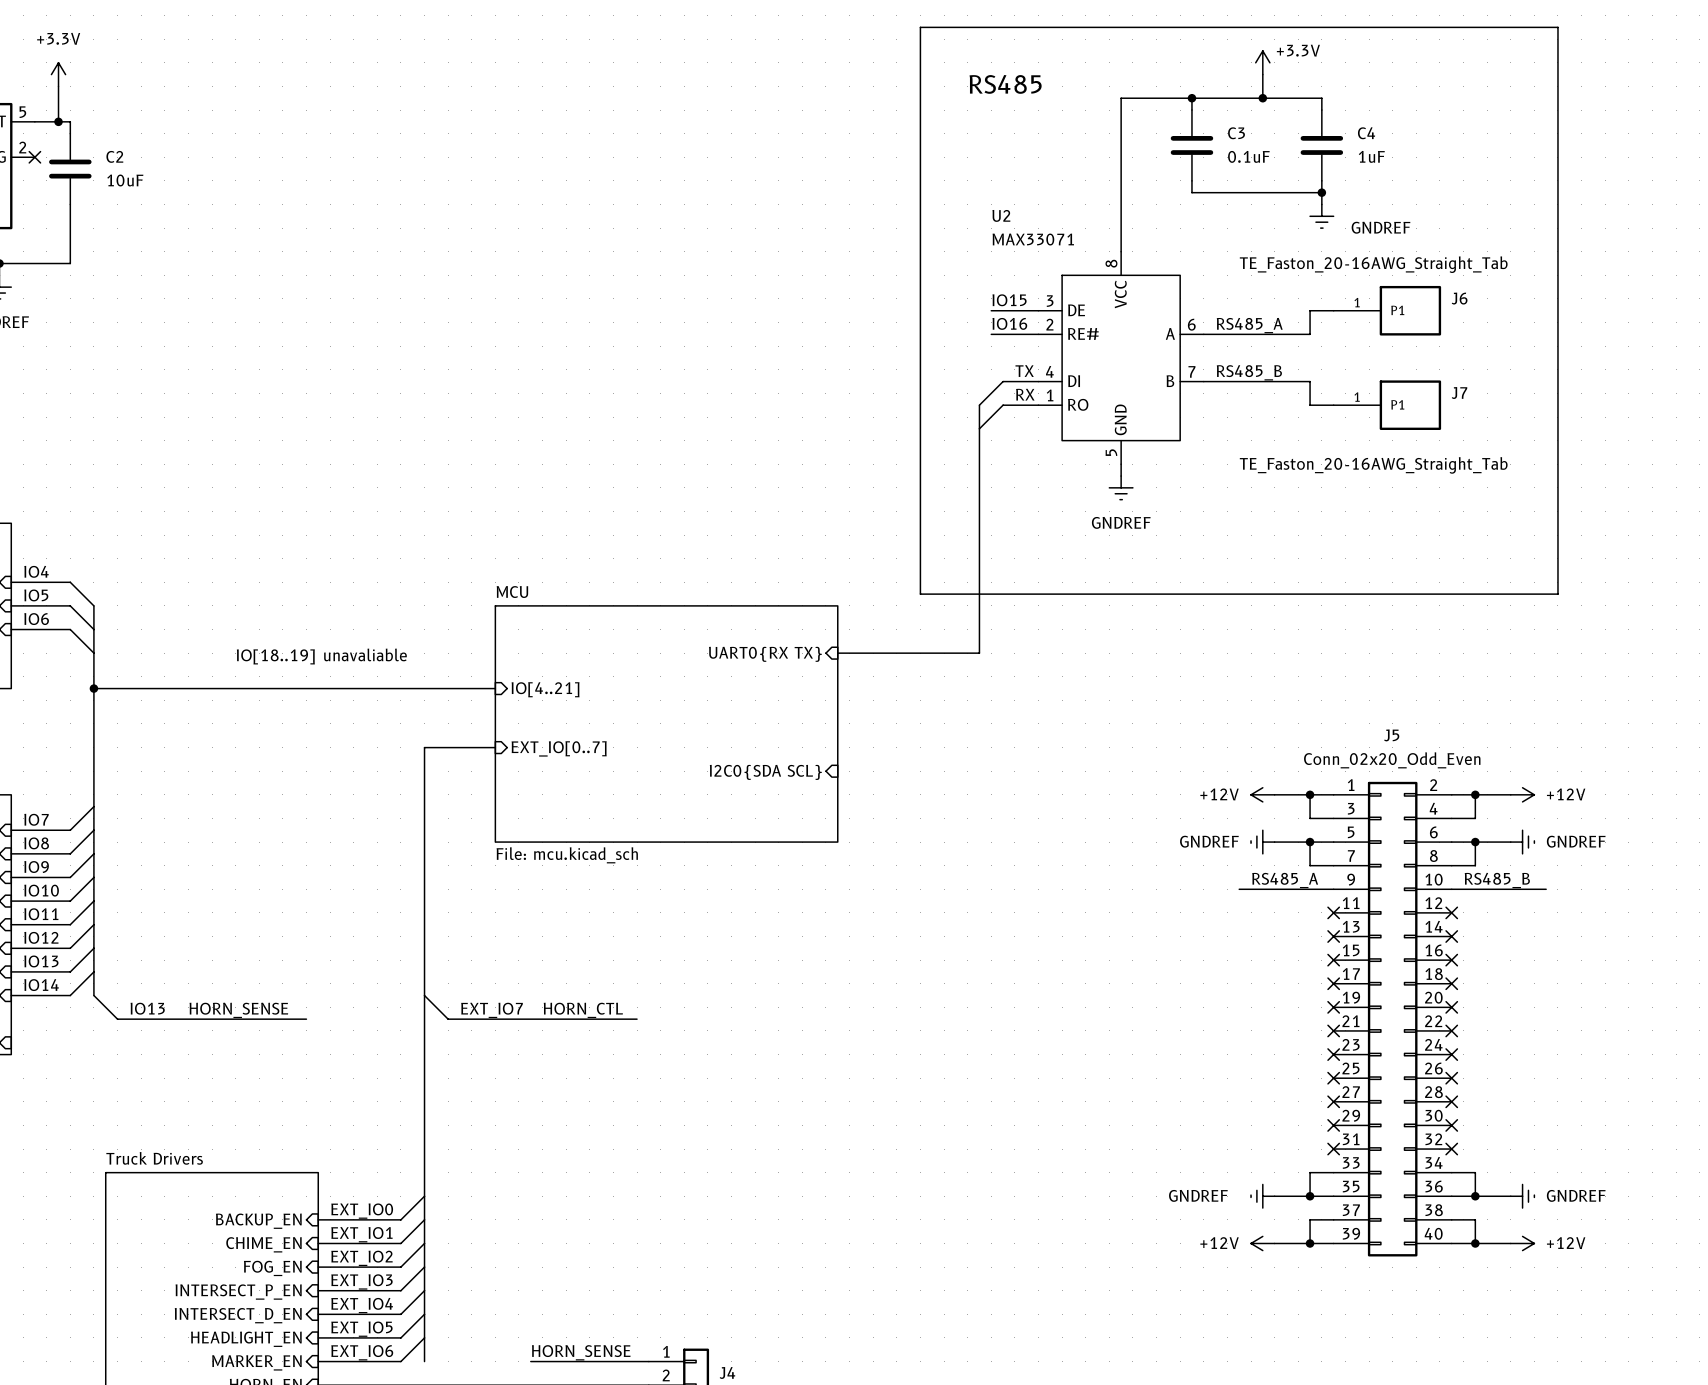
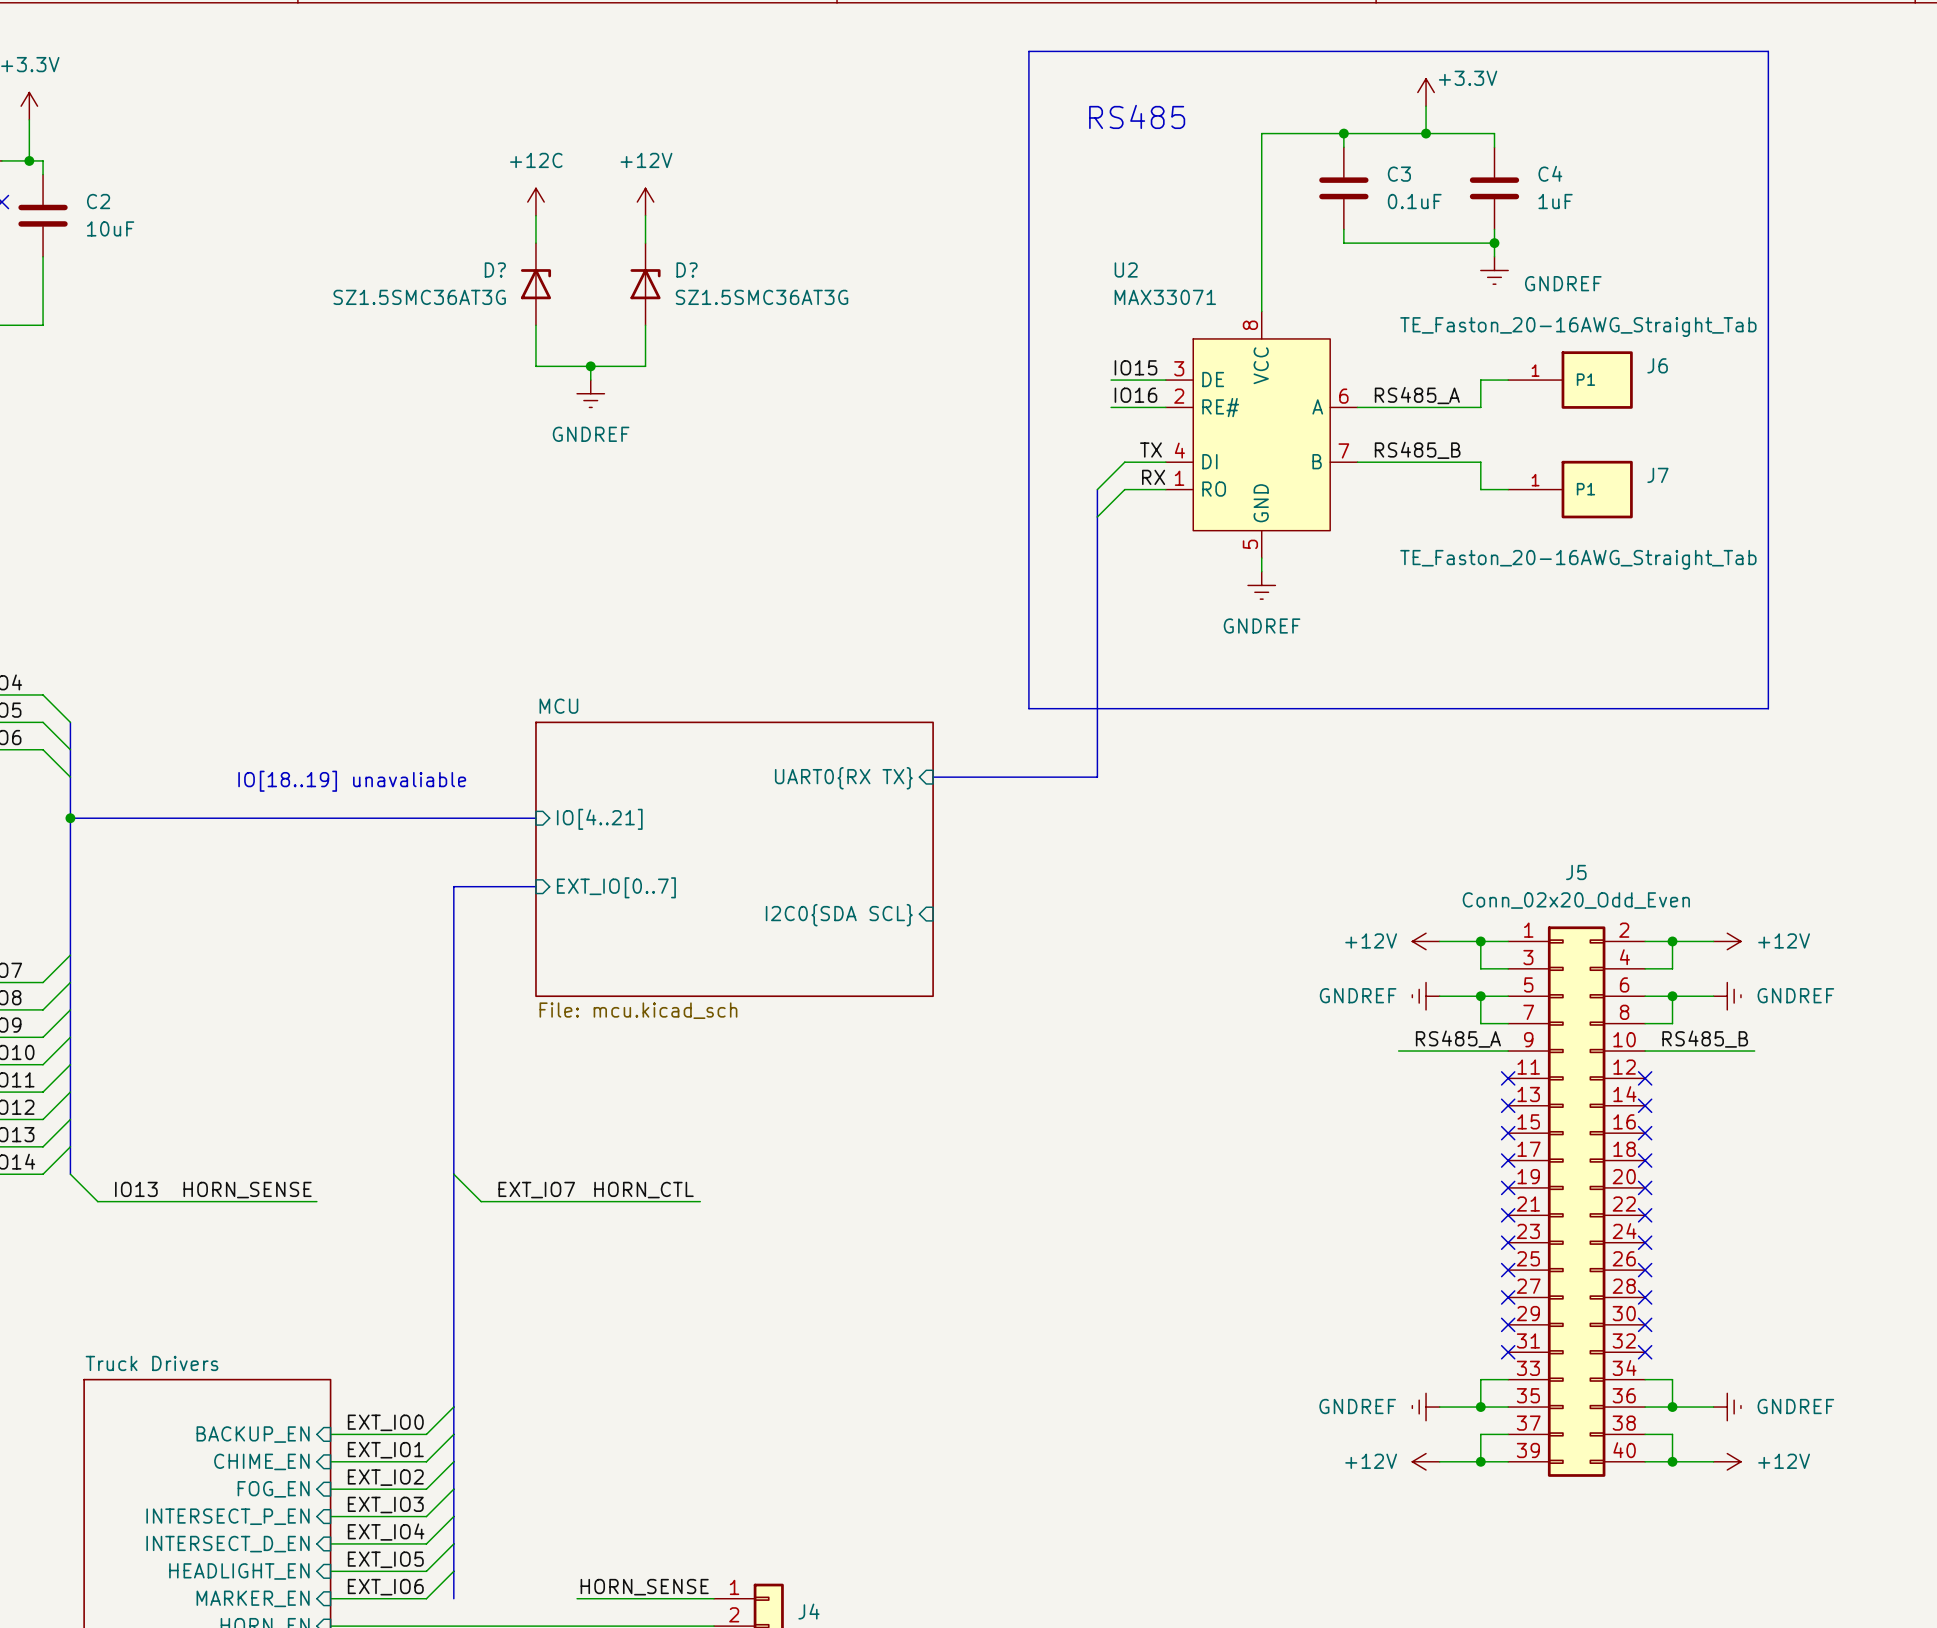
power symbol: none -> +12C (535, 202)
power symbol: none -> +12V (645, 202)
wire: none -> (535, 215) (535, 243)
wire: none -> (645, 215) (645, 243)
D?: none -> SZ1.5SMC36AT3G (535, 284)
D?: none -> SZ1.5SMC36AT3G (645, 284)
wire: none -> (535, 325) (535, 366) (645, 366) (645, 325)
wire: none -> (590, 366) (590, 380)
junction: none -> (590, 366)
power symbol: none -> GNDREF (590, 393)

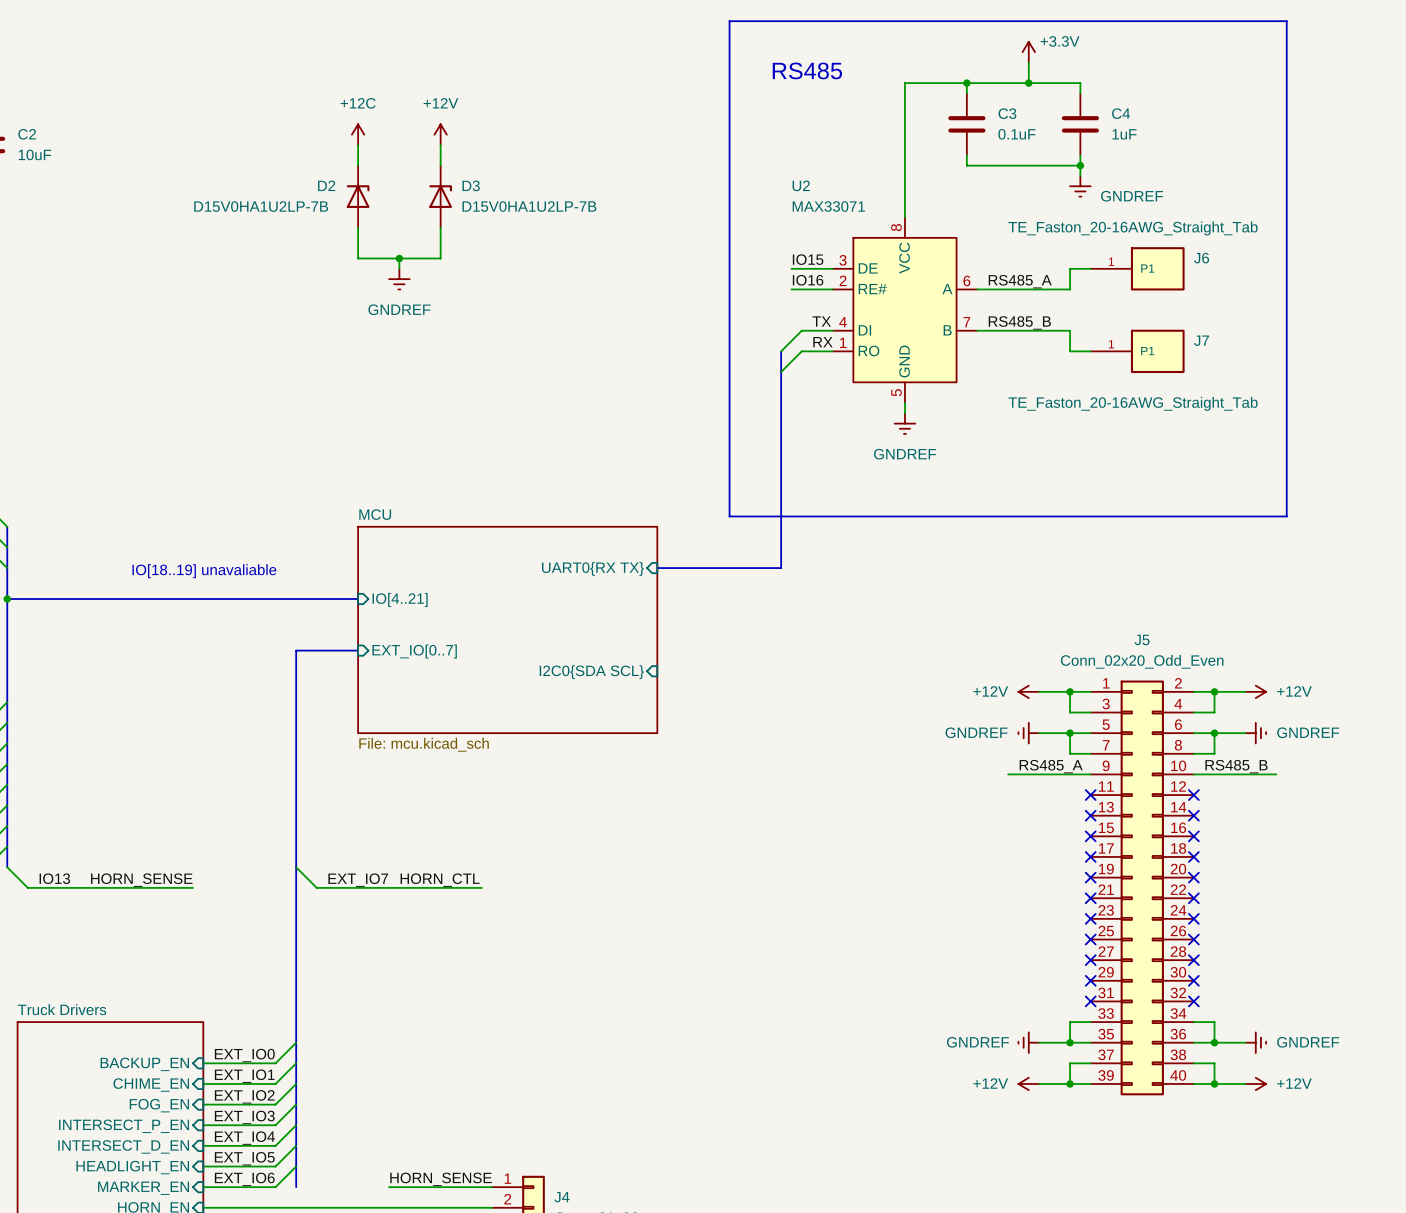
D? name: D? (495, 269) -> D2 (326, 185)
D? name: D? (687, 269) -> D3 (471, 185)
D? value: SZ1.5SMC36AT3G (419, 297) -> D15V0HA1U2LP-7B (261, 206)
D? value: SZ1.5SMC36AT3G (762, 297) -> D15V0HA1U2LP-7B (529, 206)

